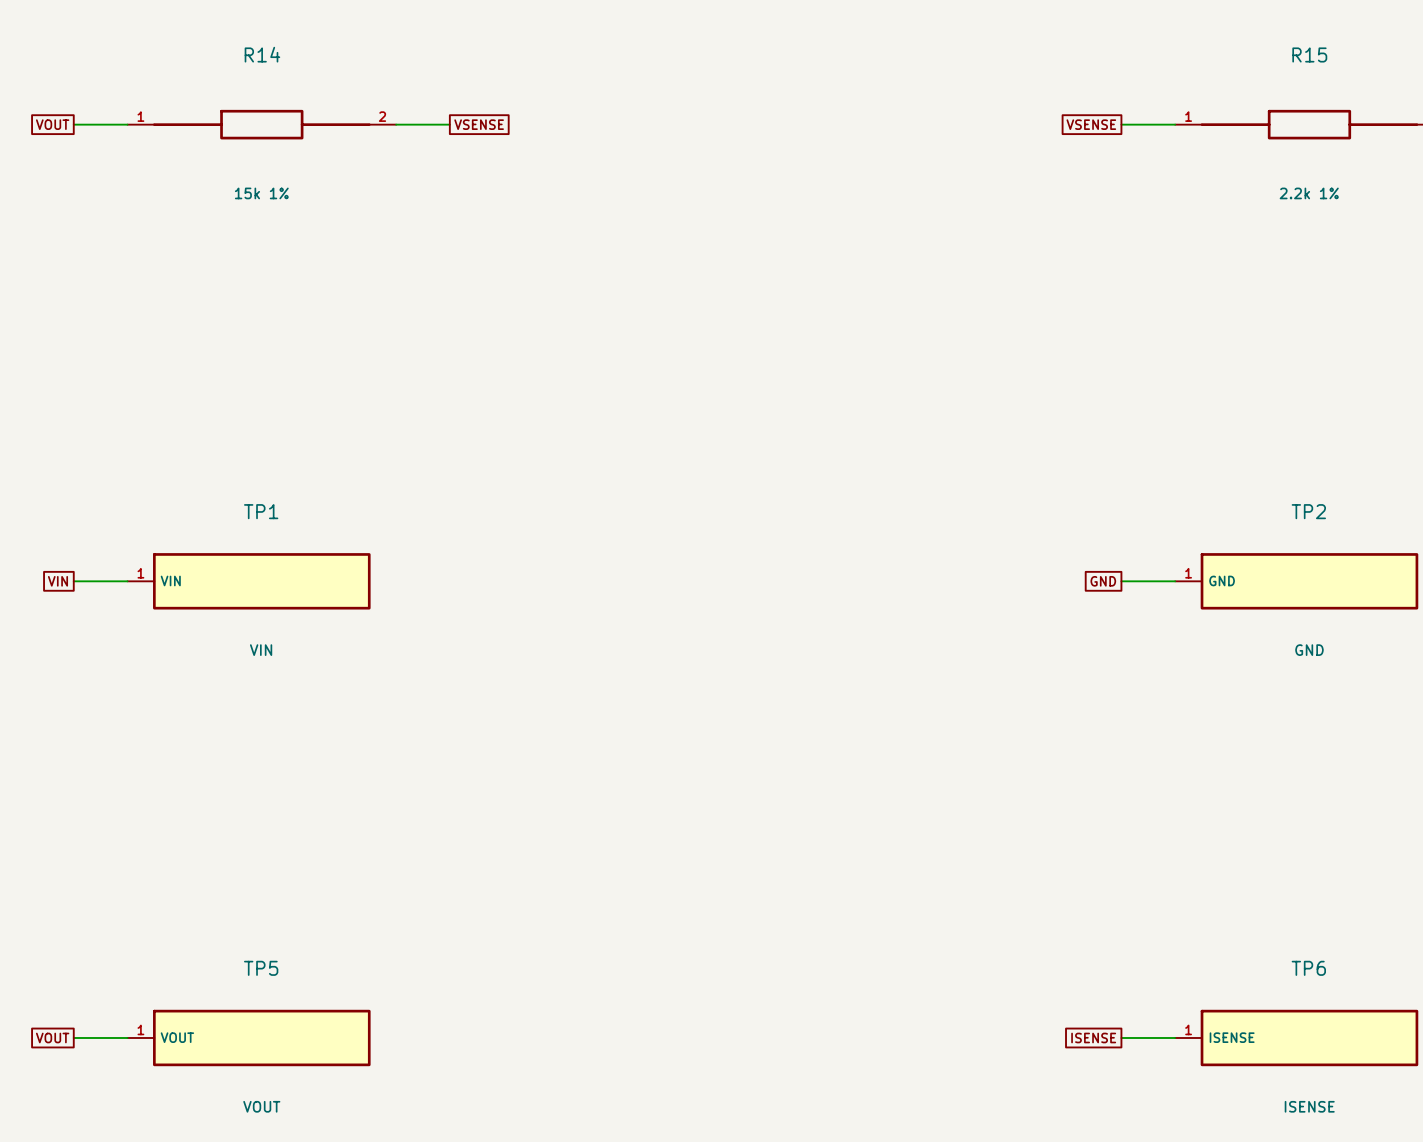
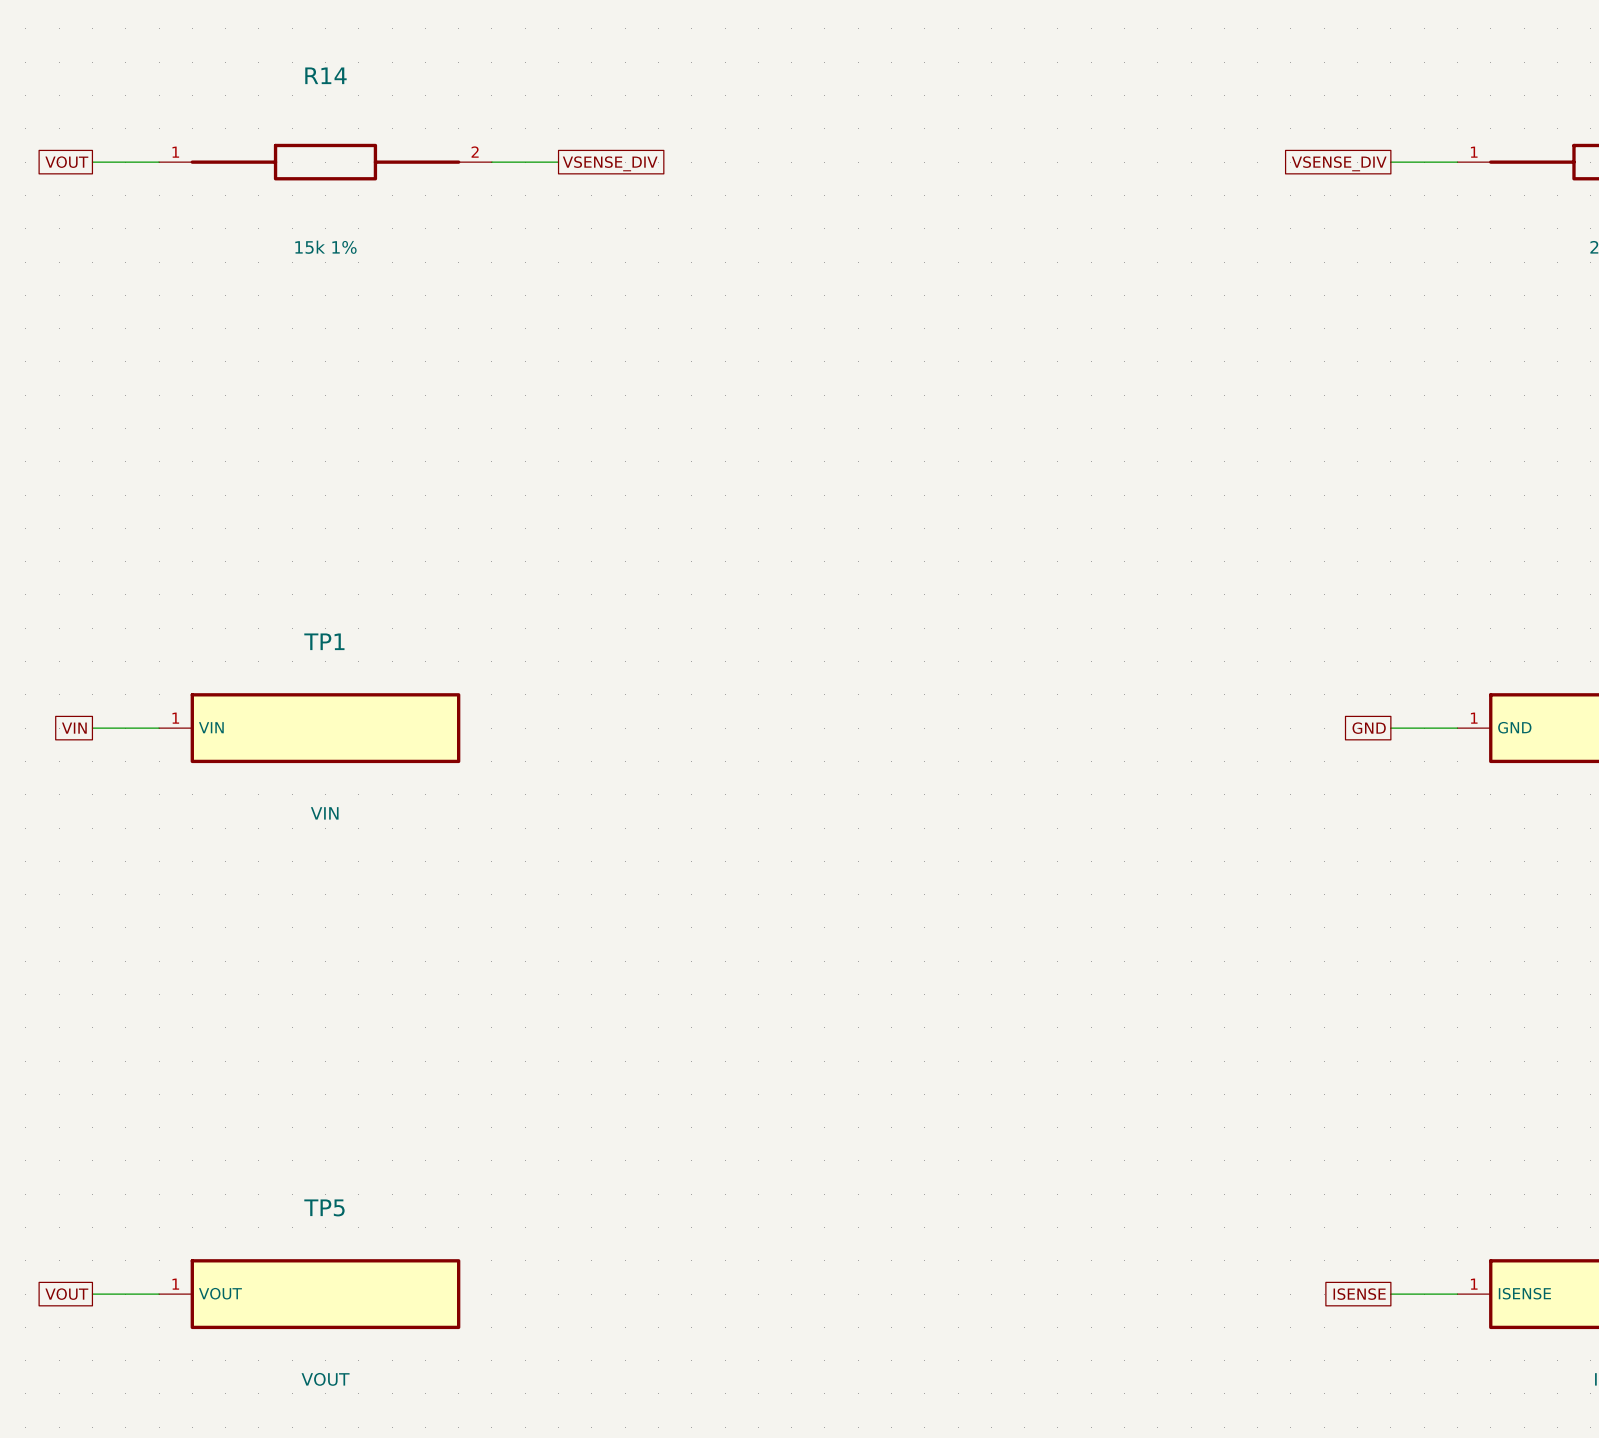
global label: VSENSE (479, 124) -> VSENSE_DIV (610, 163)
global label: VSENSE (1091, 124) -> VSENSE_DIV (1339, 163)

